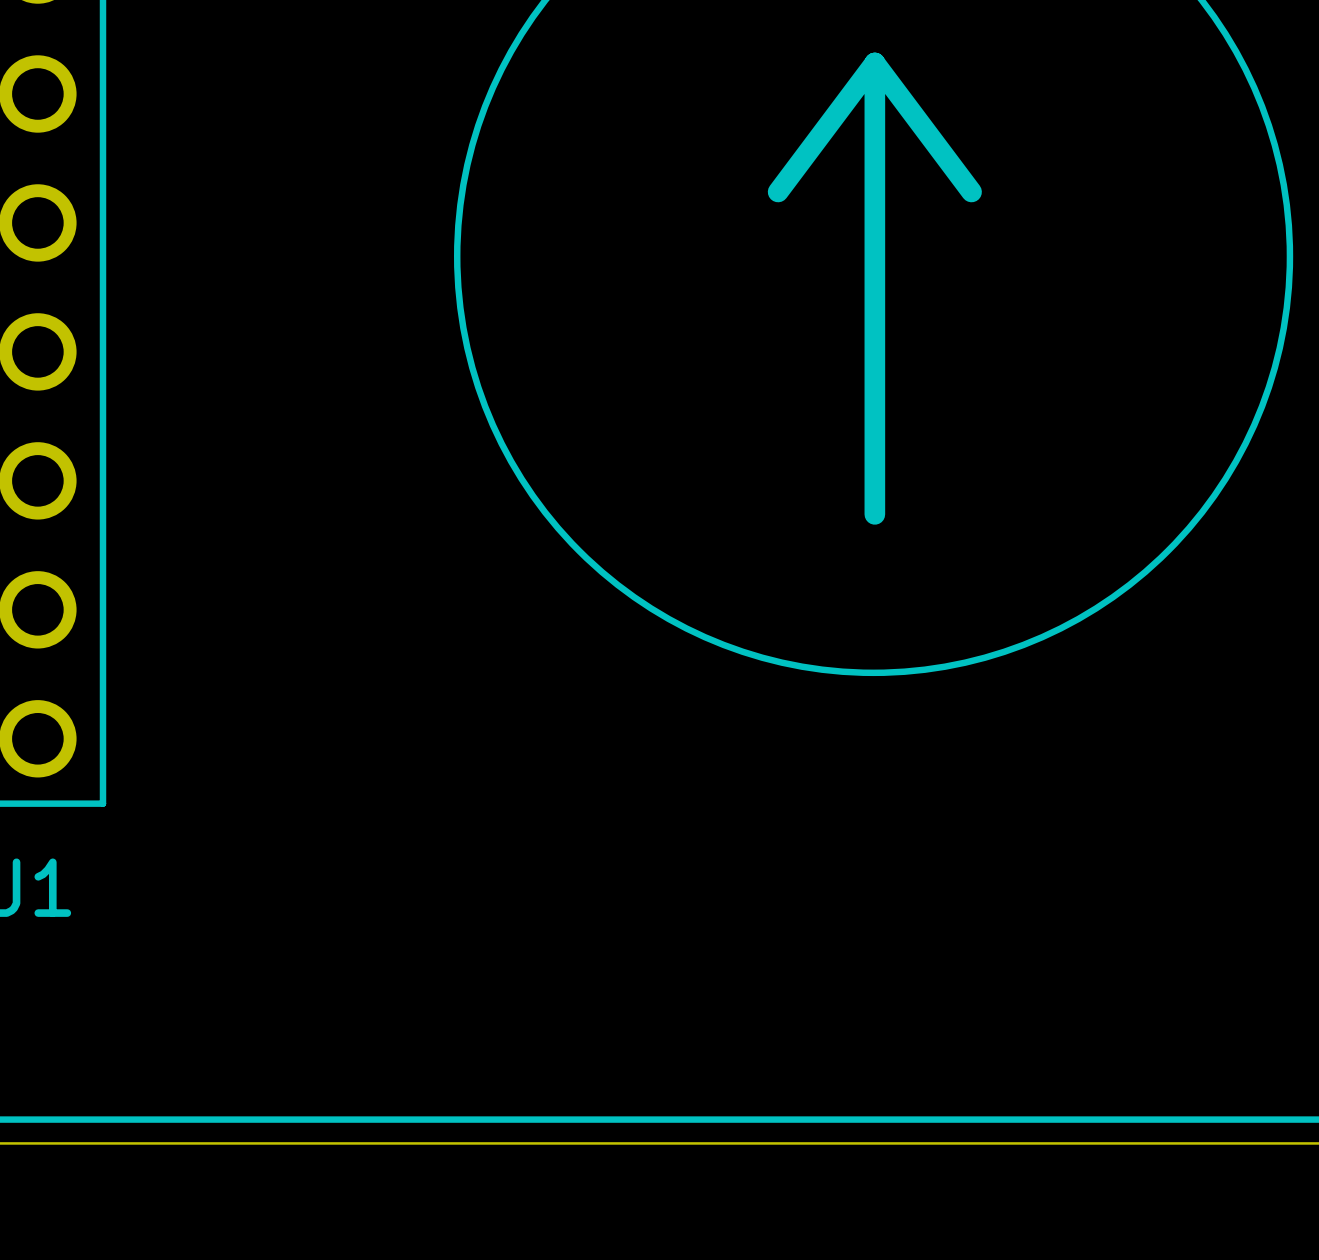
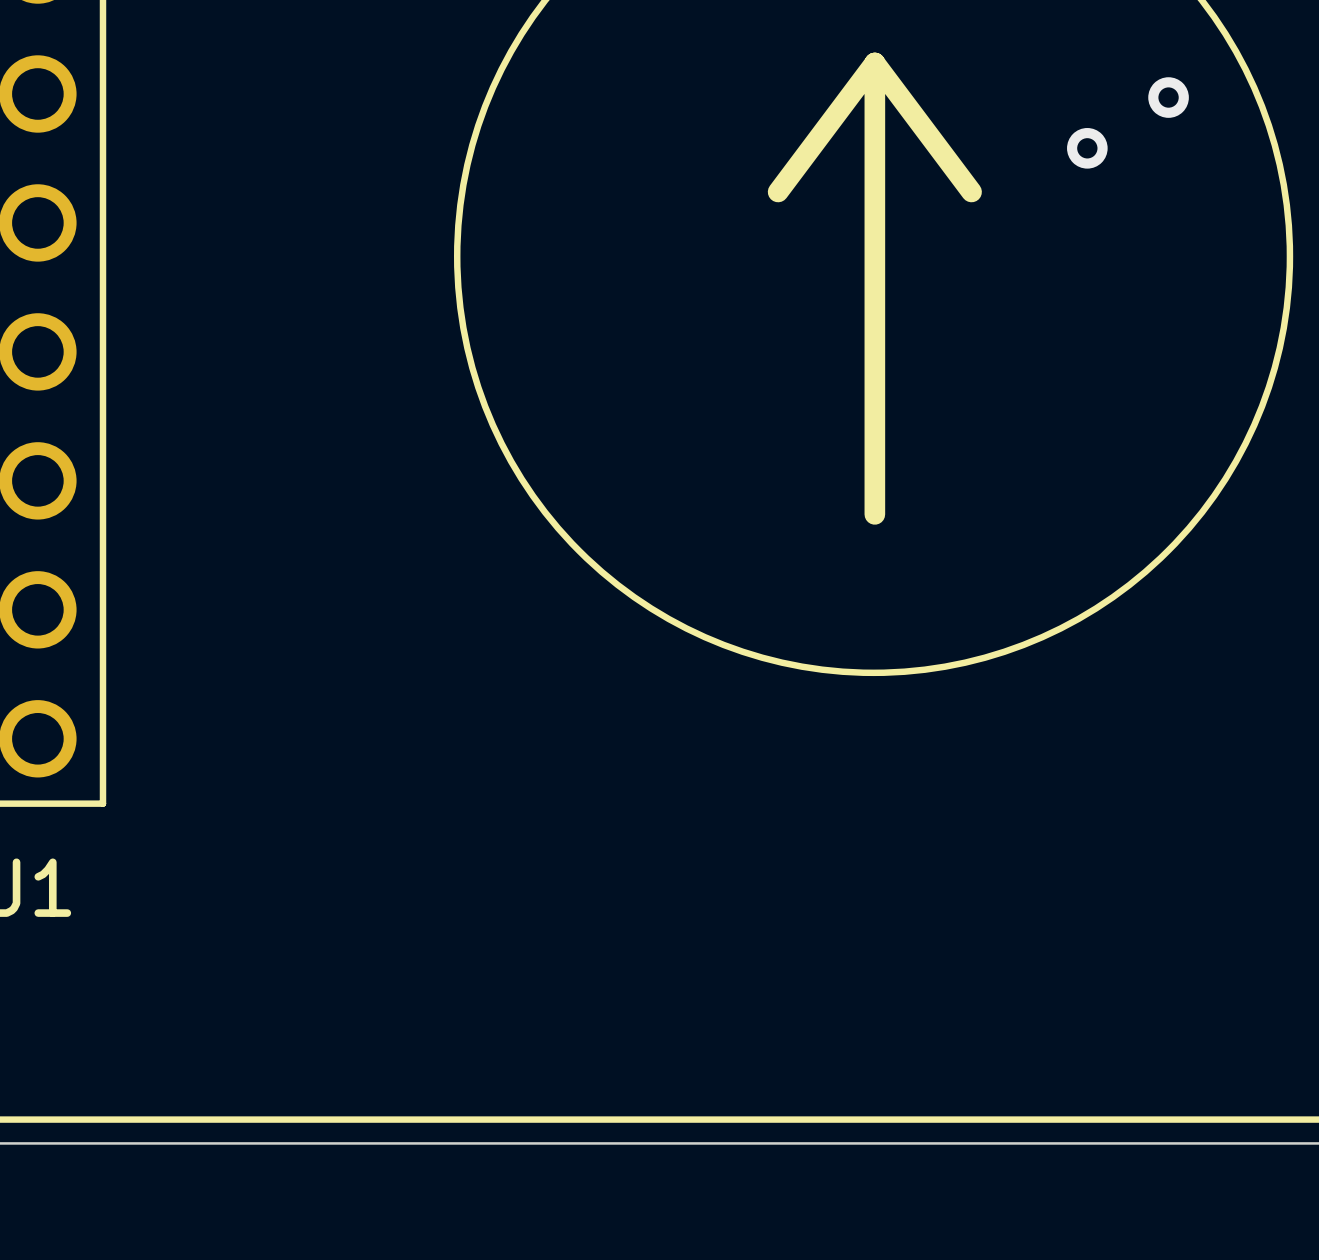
via: none -> (1168, 97)
via: none -> (1087, 148)

